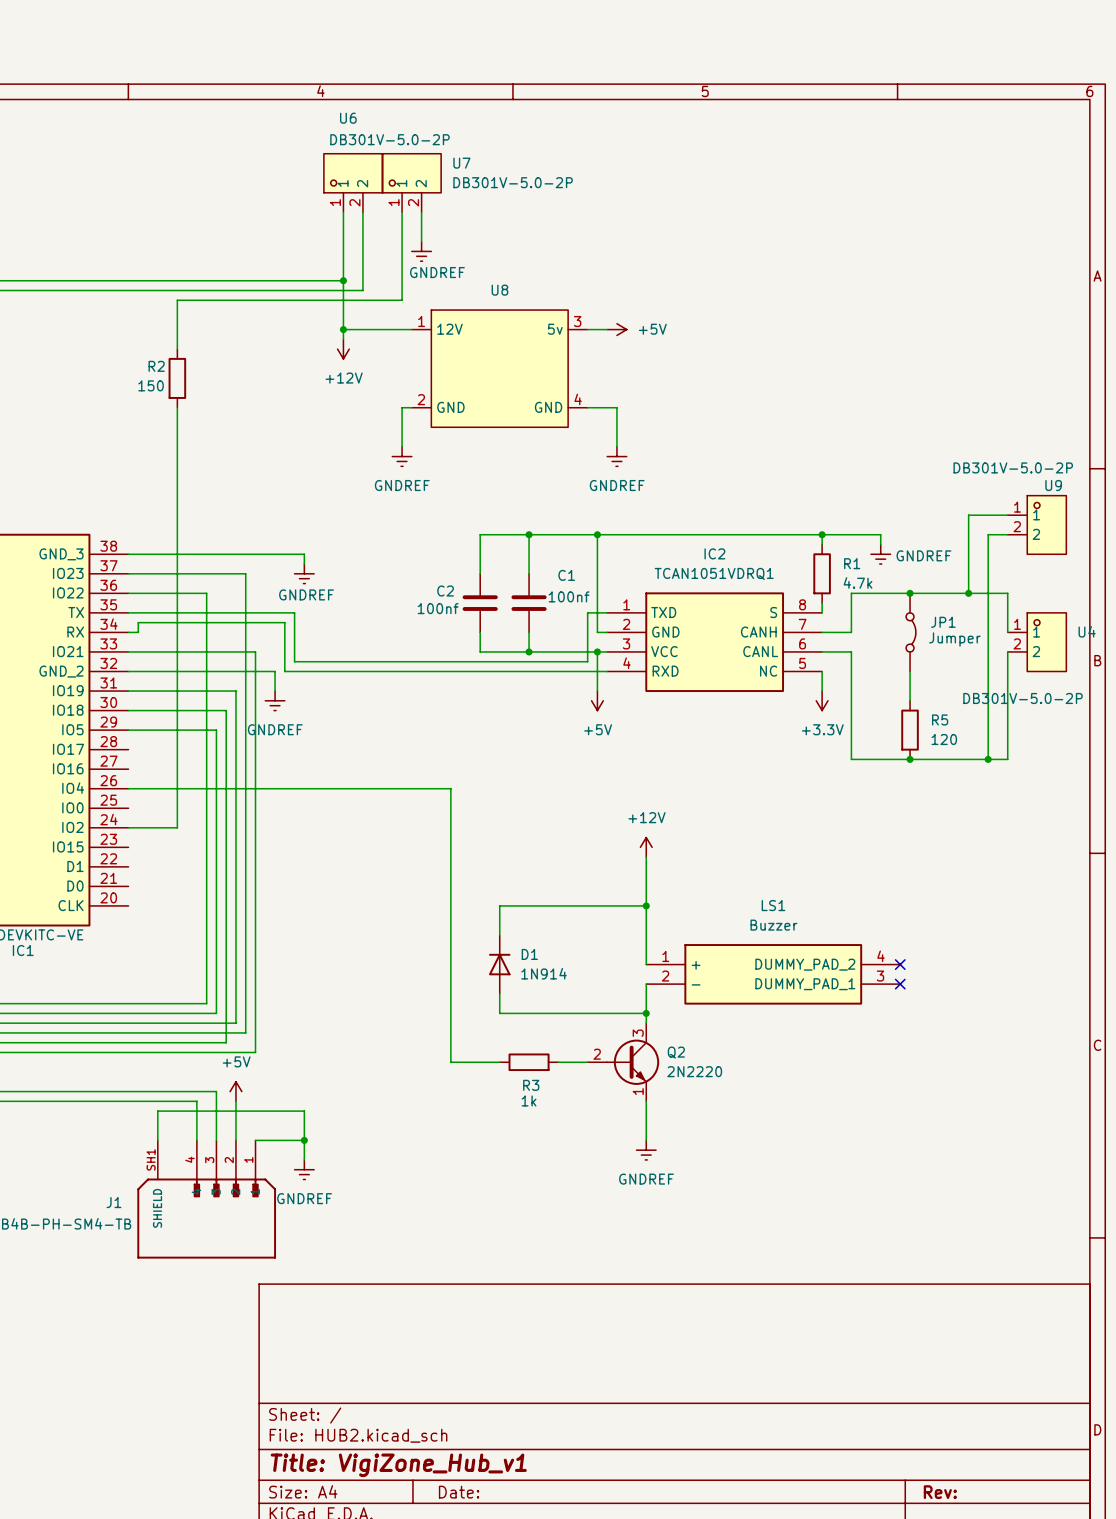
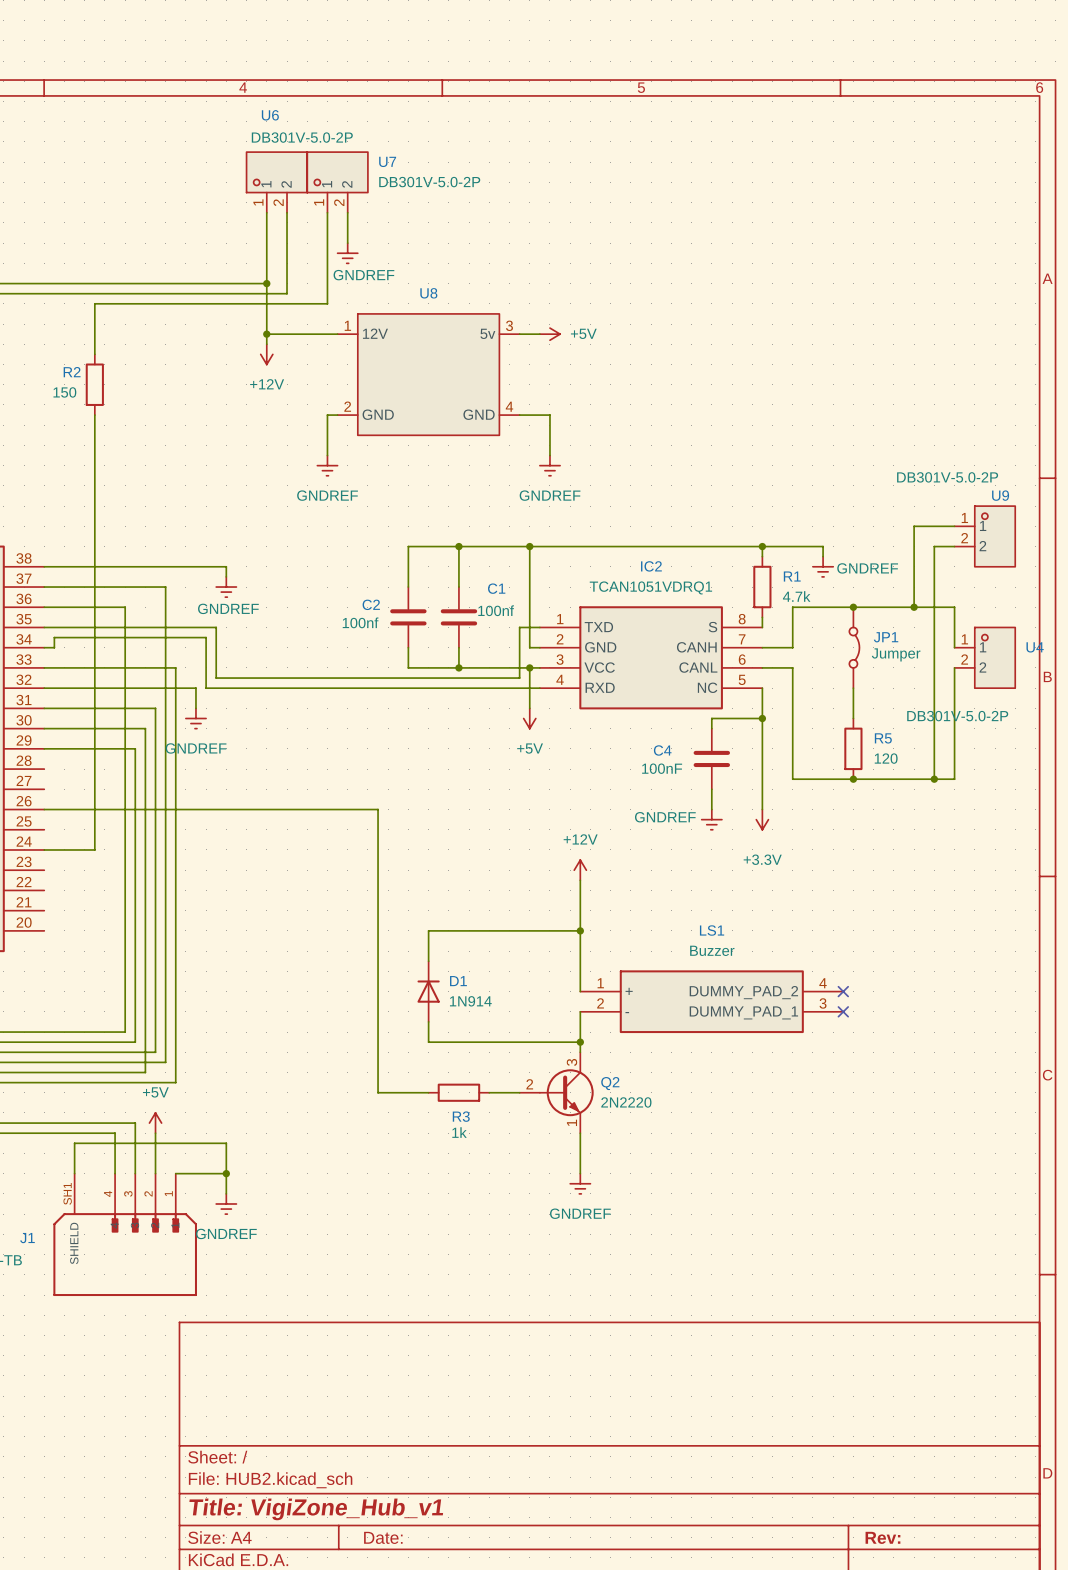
wire: none -> (762, 708) (762, 809)
wire: none -> (762, 718) (711, 718) (711, 728)
power symbol position: +3.3V (822, 700) -> +3.3V (762, 819)
junction: none -> (762, 718)
power symbol text position: +3.3V (822, 729) -> +3.3V (762, 859)
C4: none -> 100nF (711, 758)
wire: none -> (711, 789) (711, 809)
power symbol: none -> GNDREF (711, 819)

